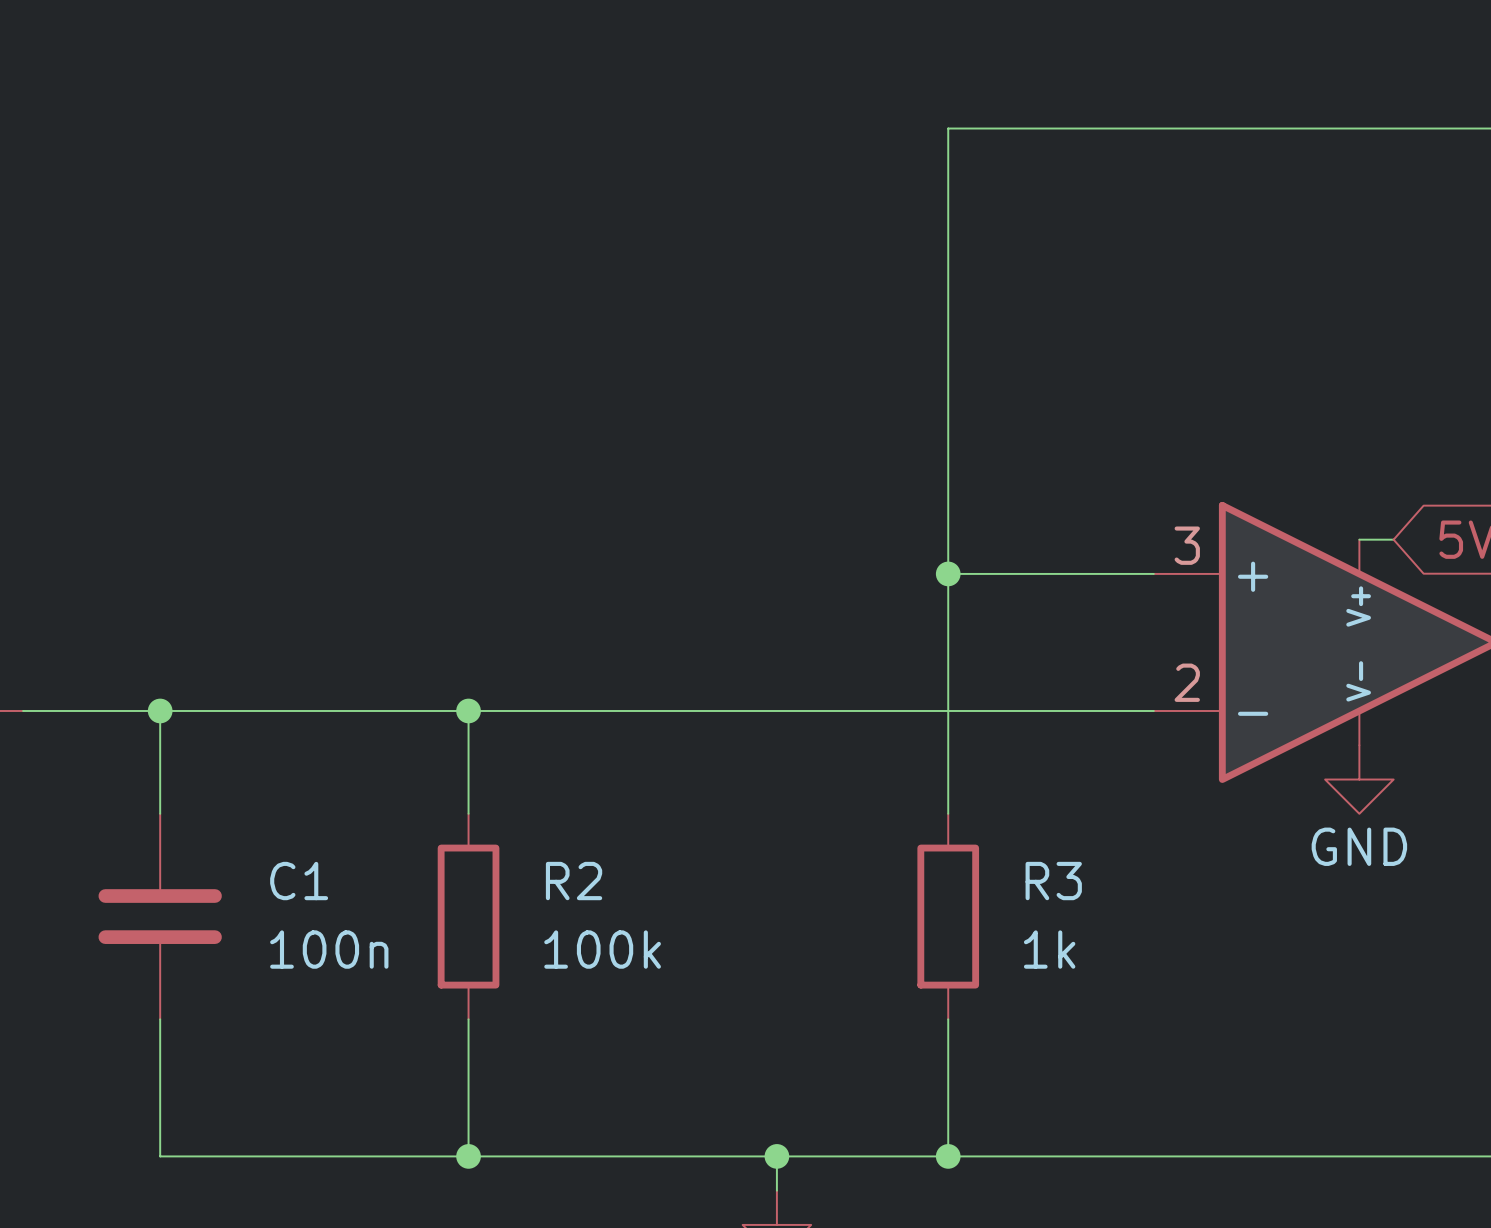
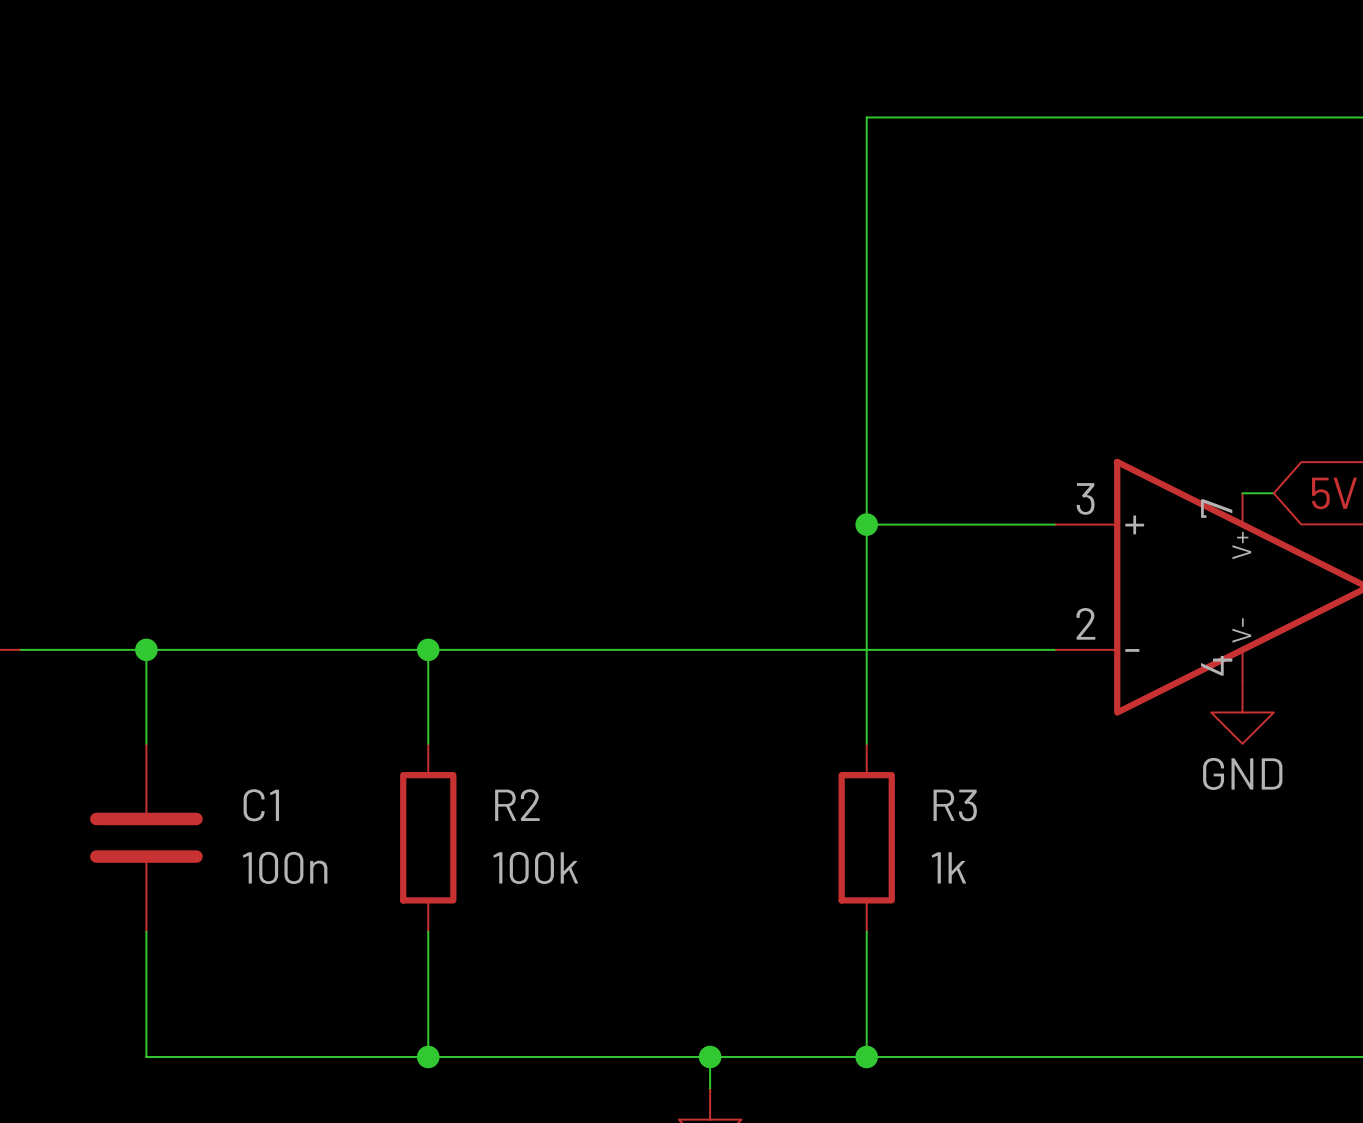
part pin number: none -> 7 (1216, 508)
part pin number: none -> 4 (1216, 665)

